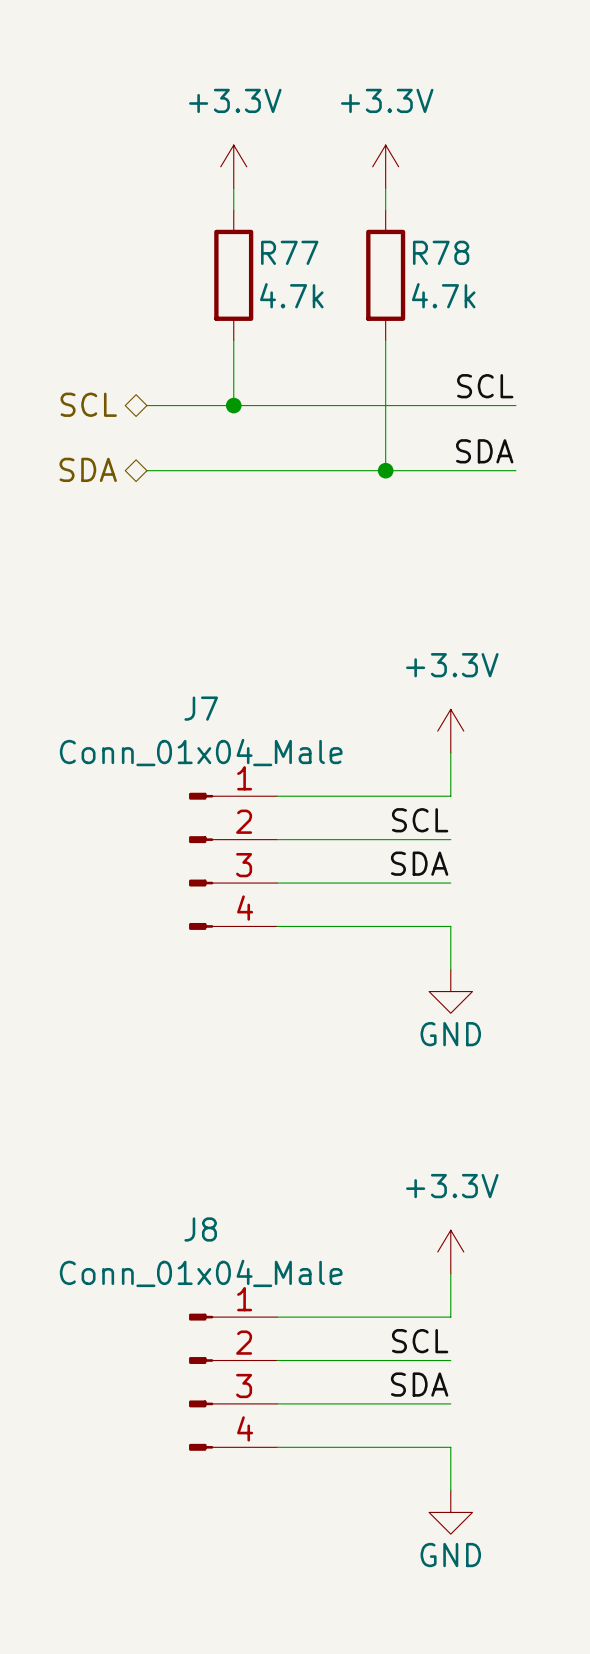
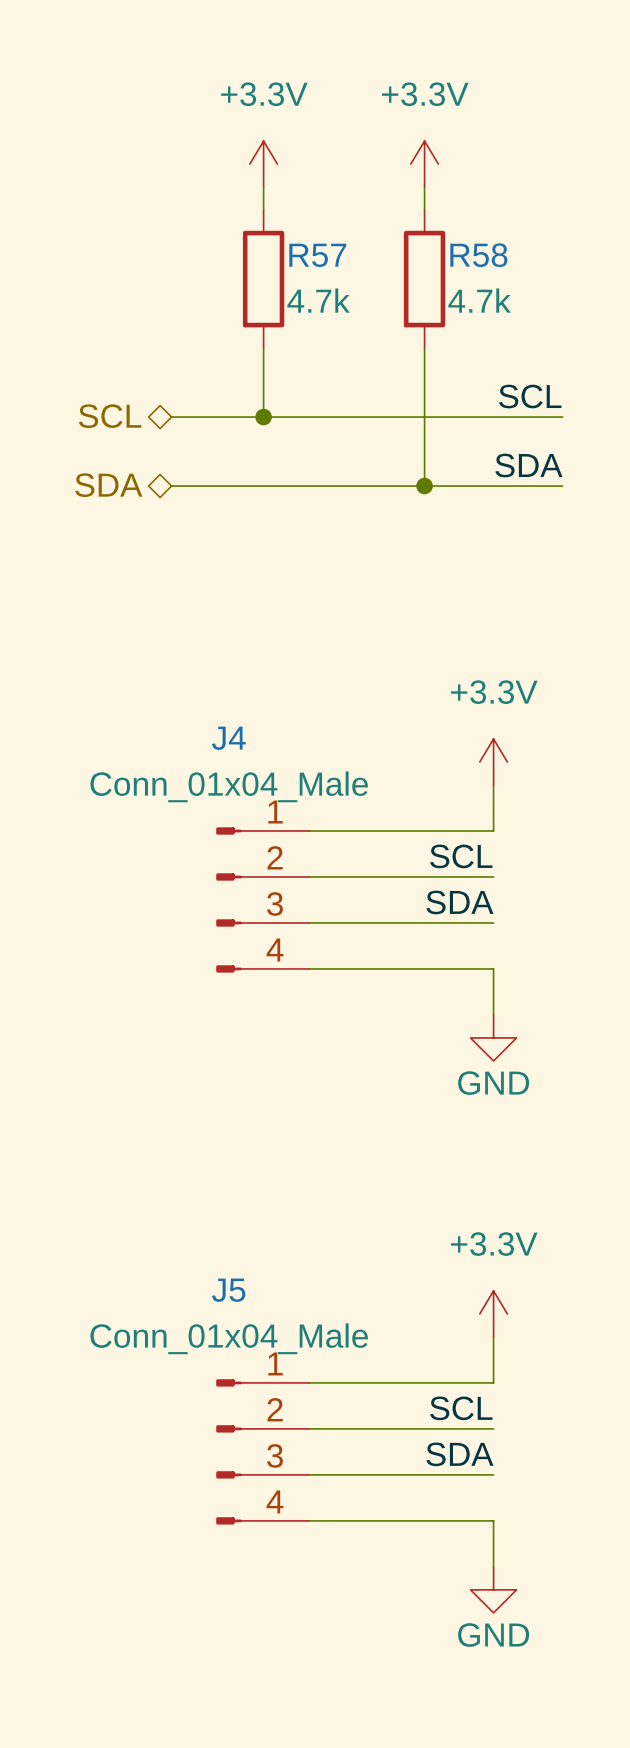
R77 name: R77 (289, 252) -> R57 (317, 255)
R78 name: R78 (441, 252) -> R58 (478, 255)
J7 name: J7 (201, 708) -> J4 (228, 738)
J8 name: J8 (200, 1229) -> J5 (228, 1290)

